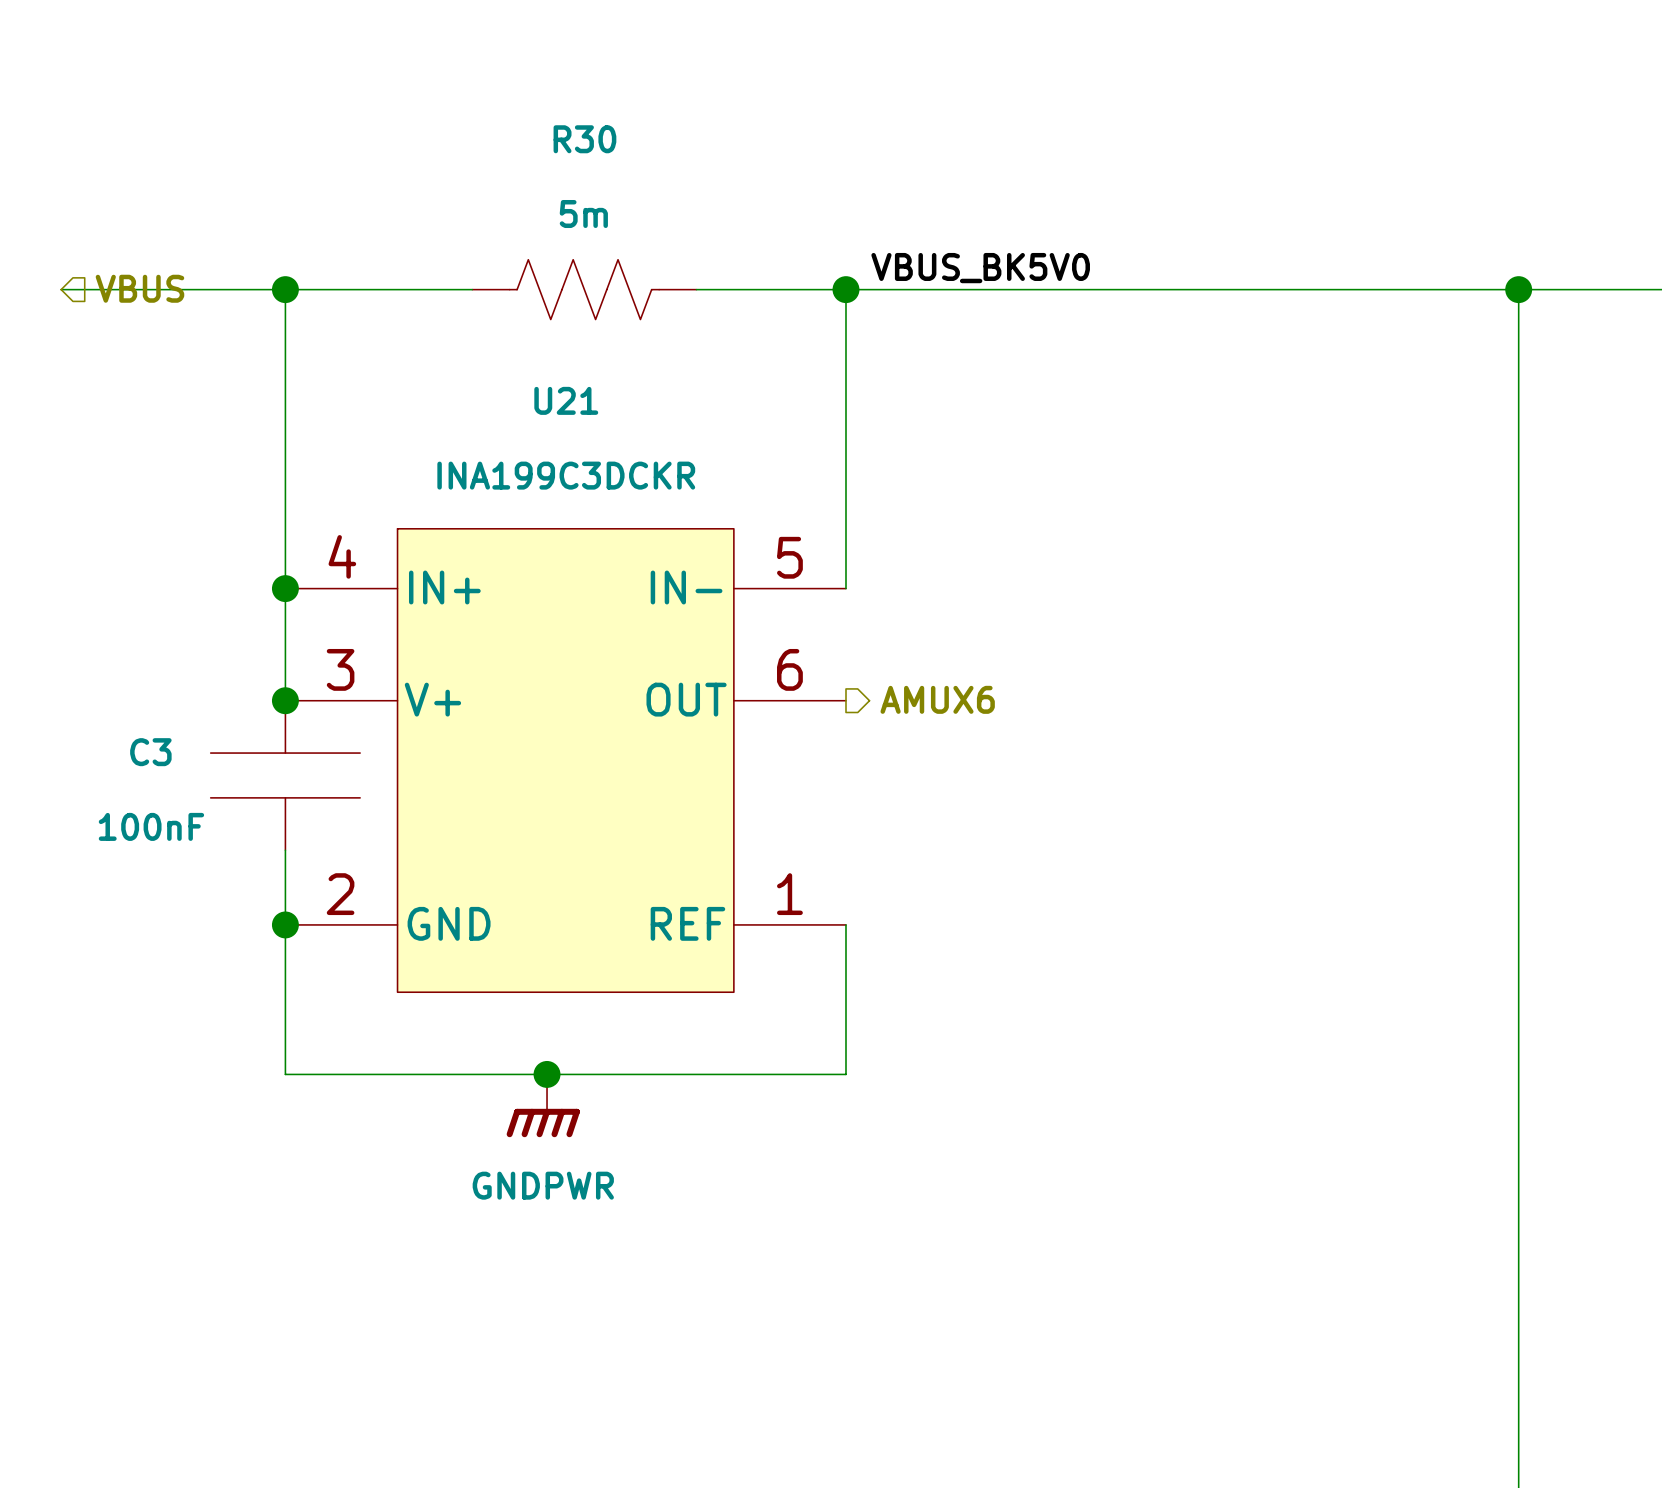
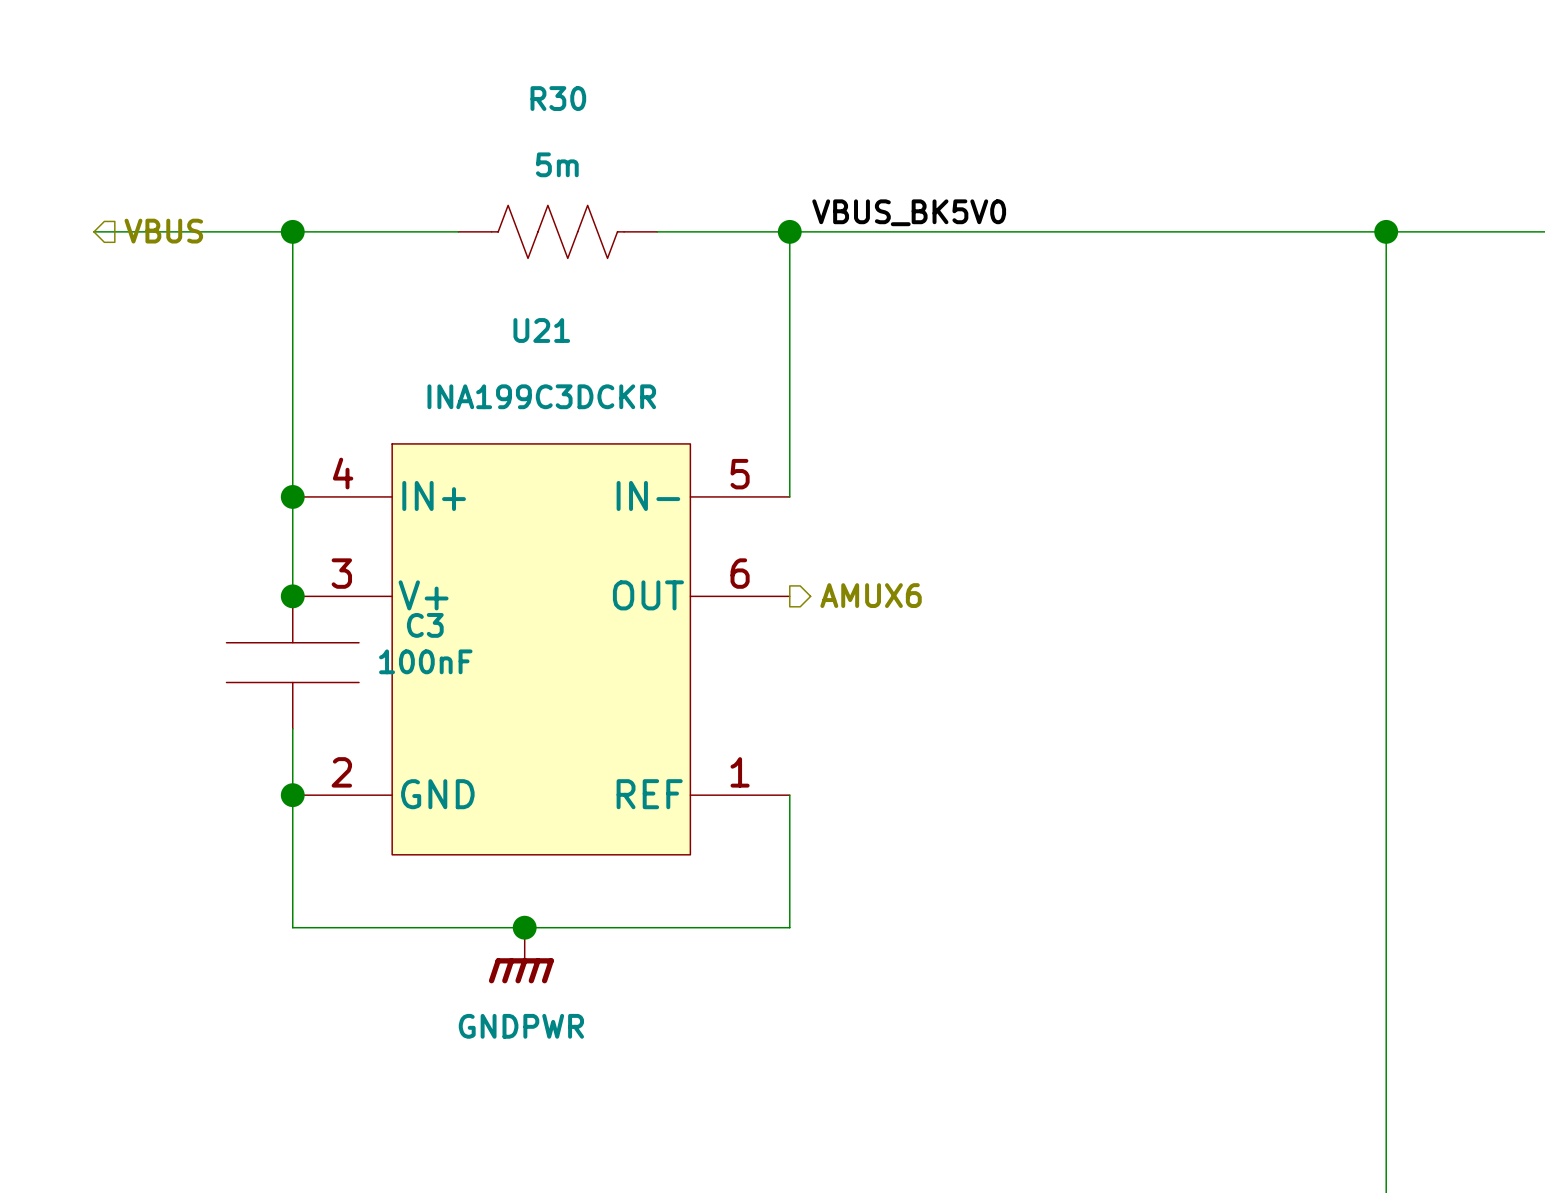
U21 symbol: [285, 528, 846, 993] -> [292, 443, 790, 855]
C3 name position: C3 (150, 752) -> C3 (425, 625)
C3 value position: 100nF (151, 826) -> 100nF (425, 661)

